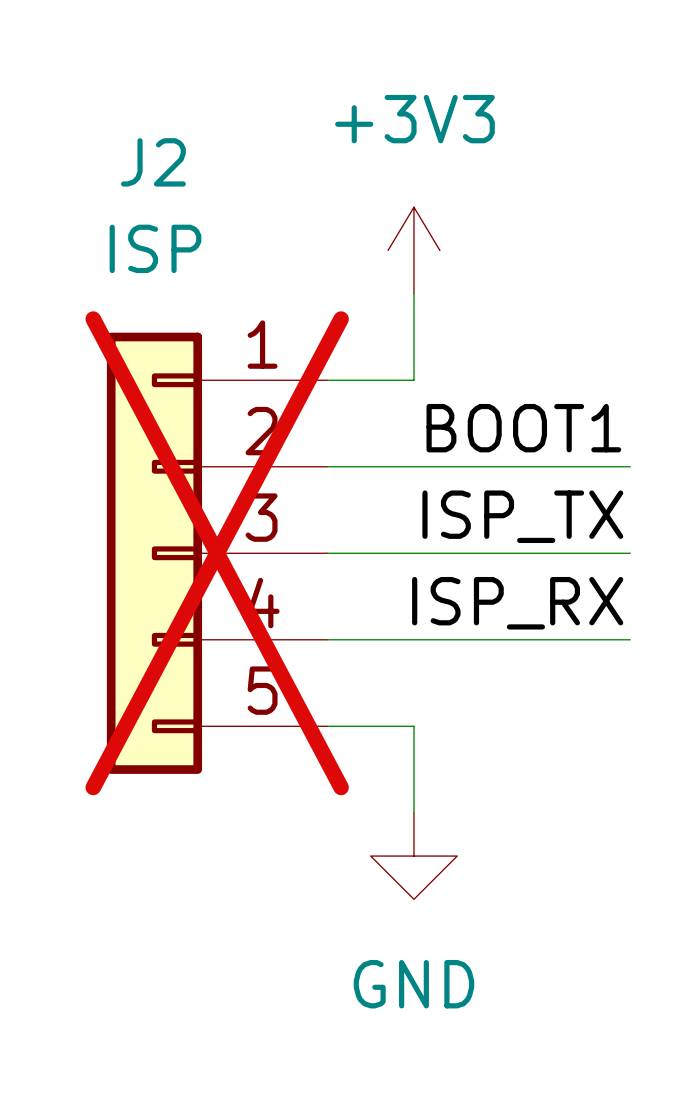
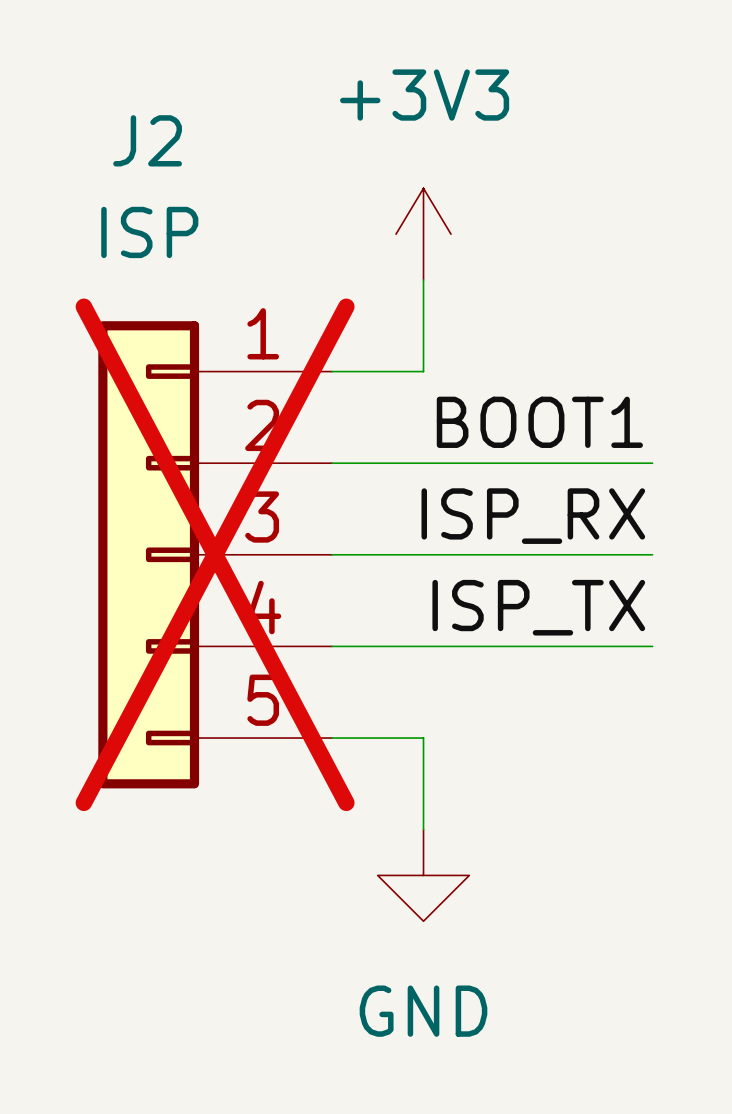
label: ISP_TX (522, 516) -> ISP_RX (533, 516)
label: ISP_RX (517, 603) -> ISP_TX (538, 607)

